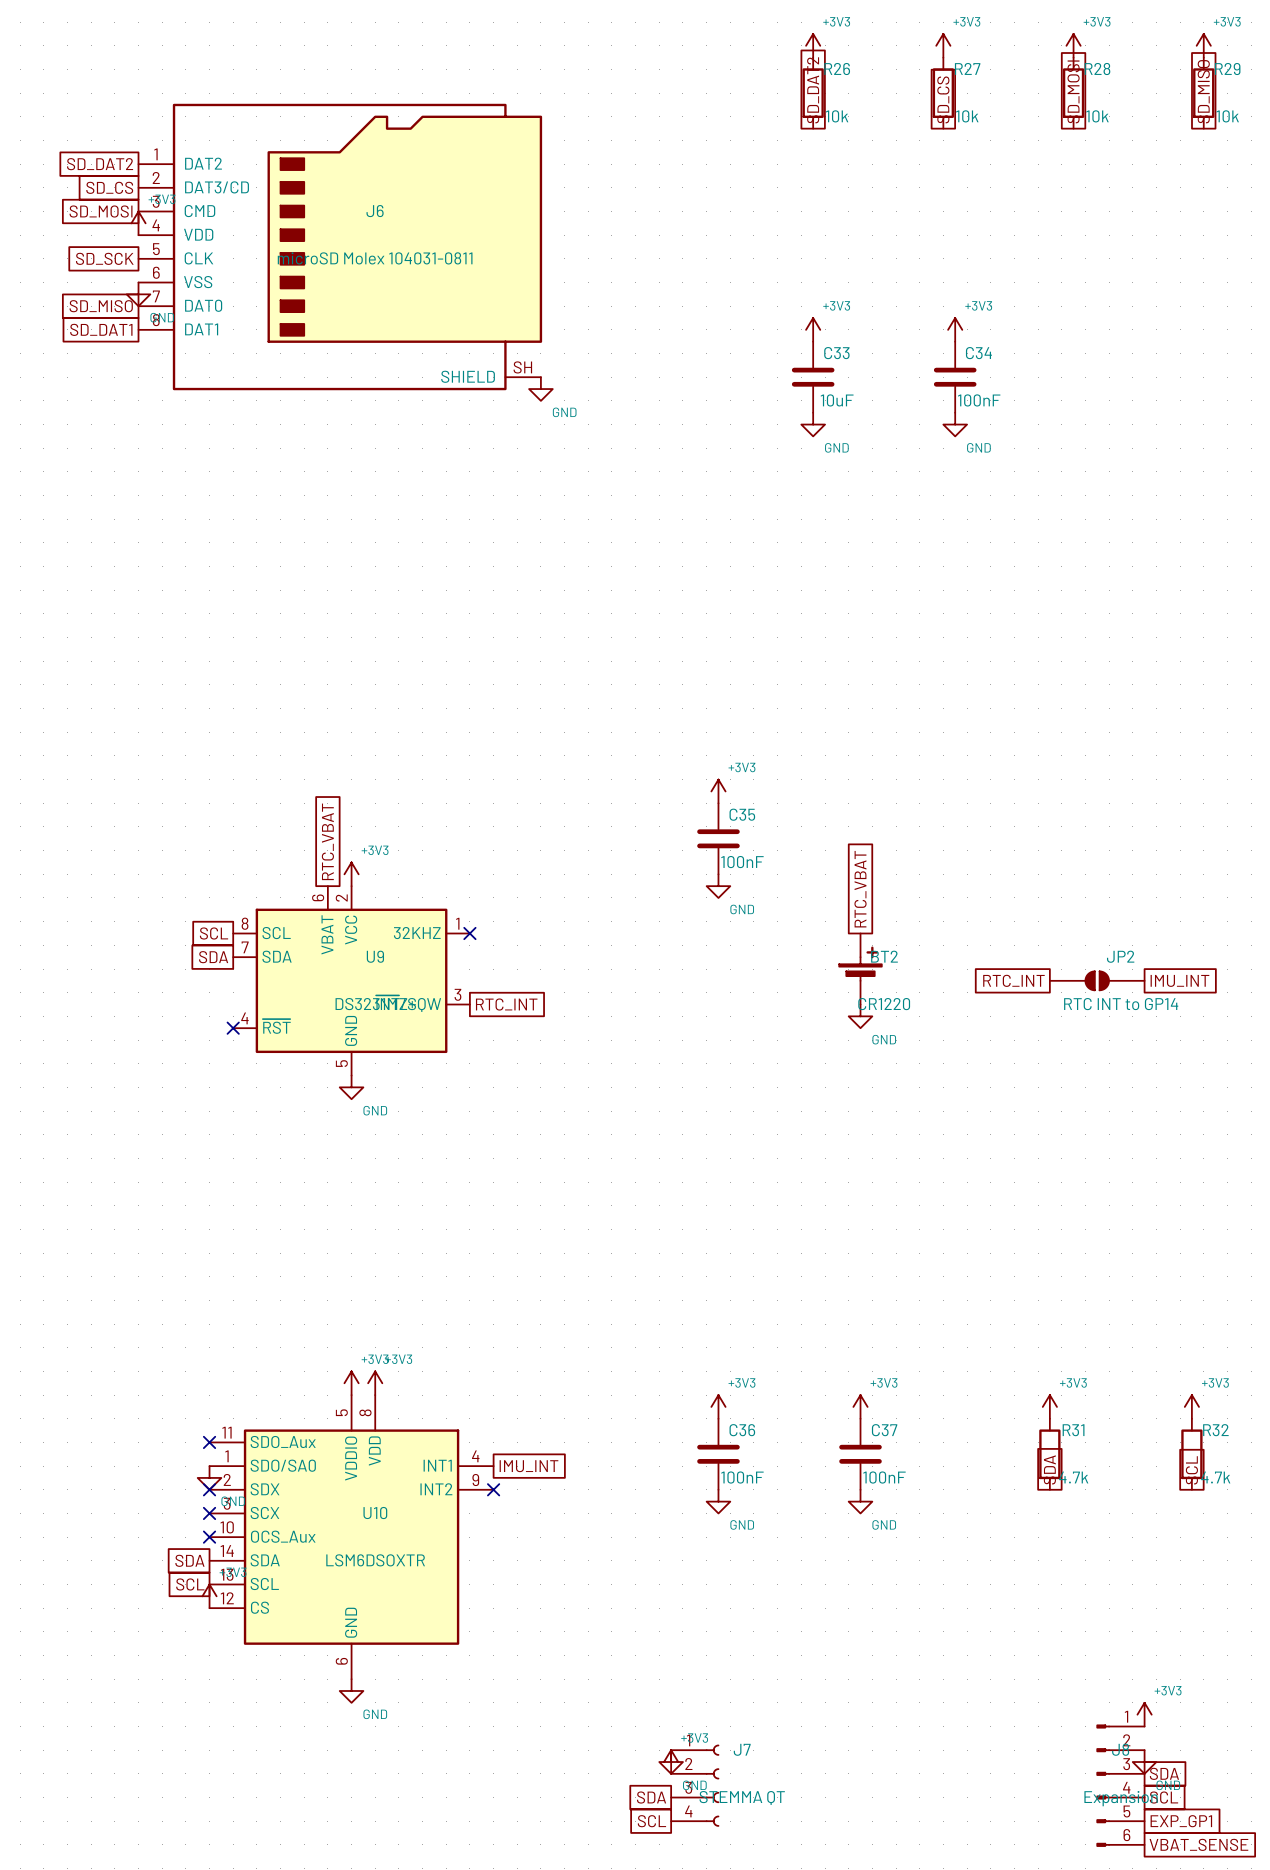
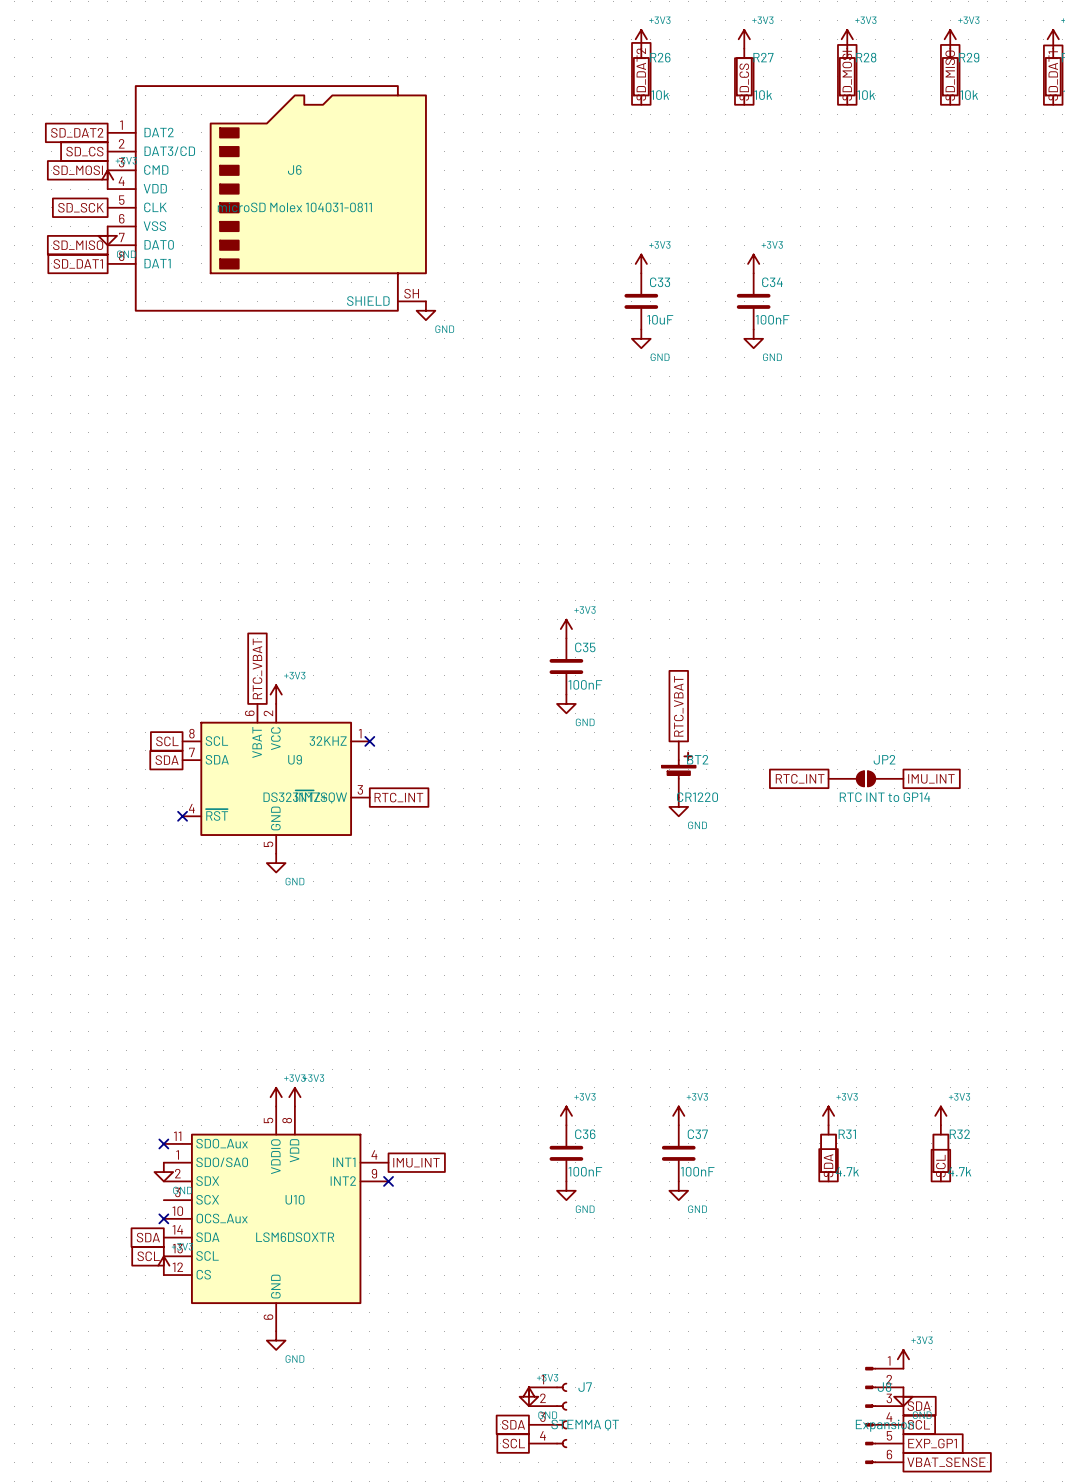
no-connect mark: (209, 1489) -> none
no-connect mark: (209, 1513) -> none

